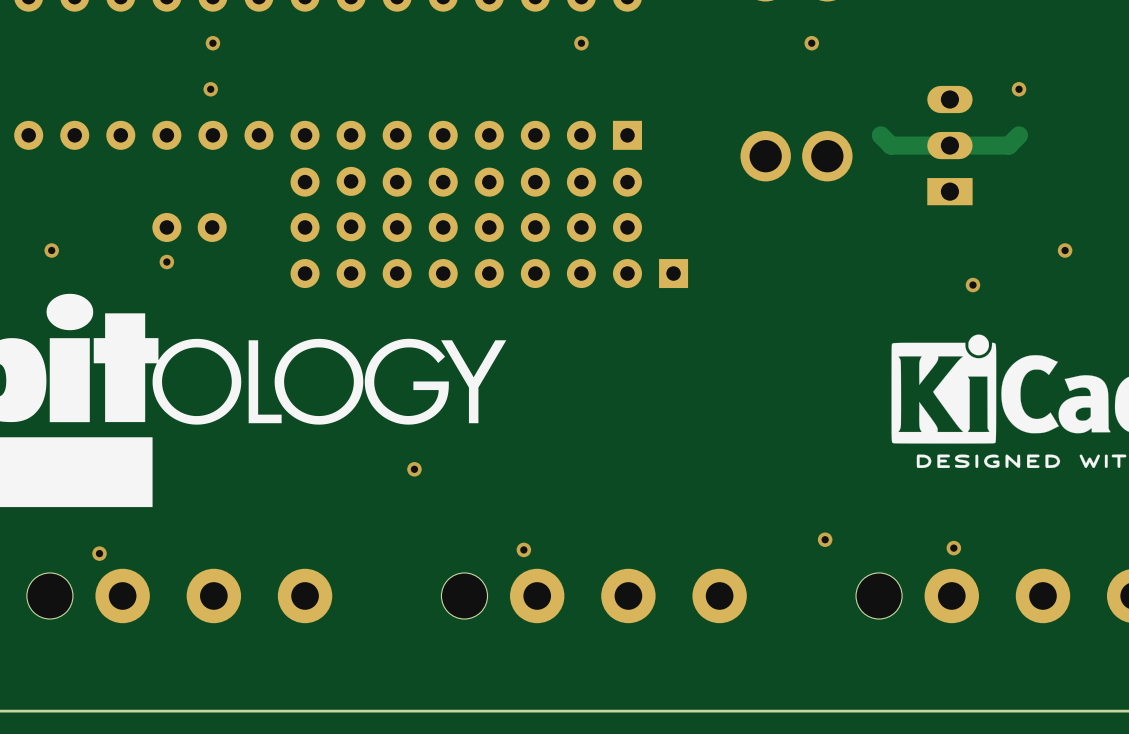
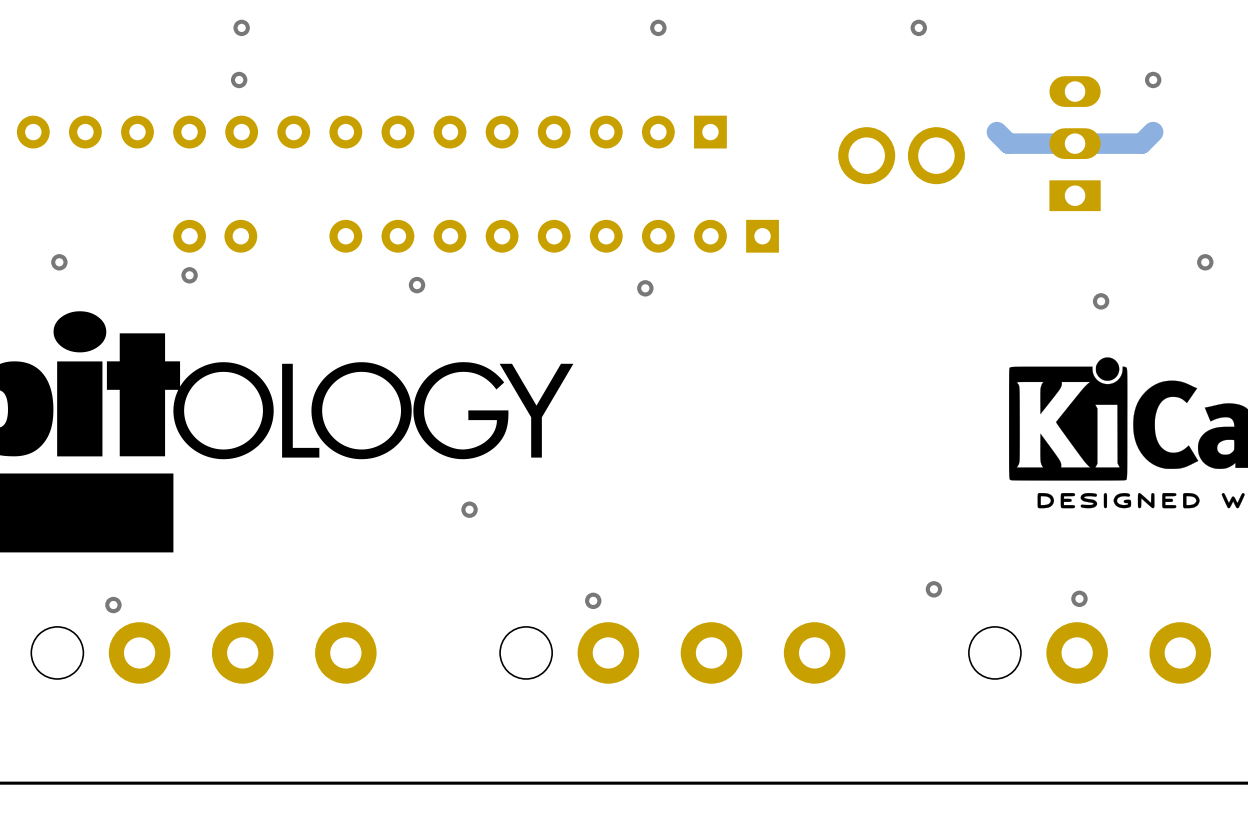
part: (305, 204) -> none
part: (351, 204) -> none
part: (397, 204) -> none
part: (443, 204) -> none
part: (489, 204) -> none
part: (535, 204) -> none
part: (581, 204) -> none
part: (627, 204) -> none
via: none -> (417, 285)
part position: (489, 273) -> (554, 236)
via: none -> (645, 288)

